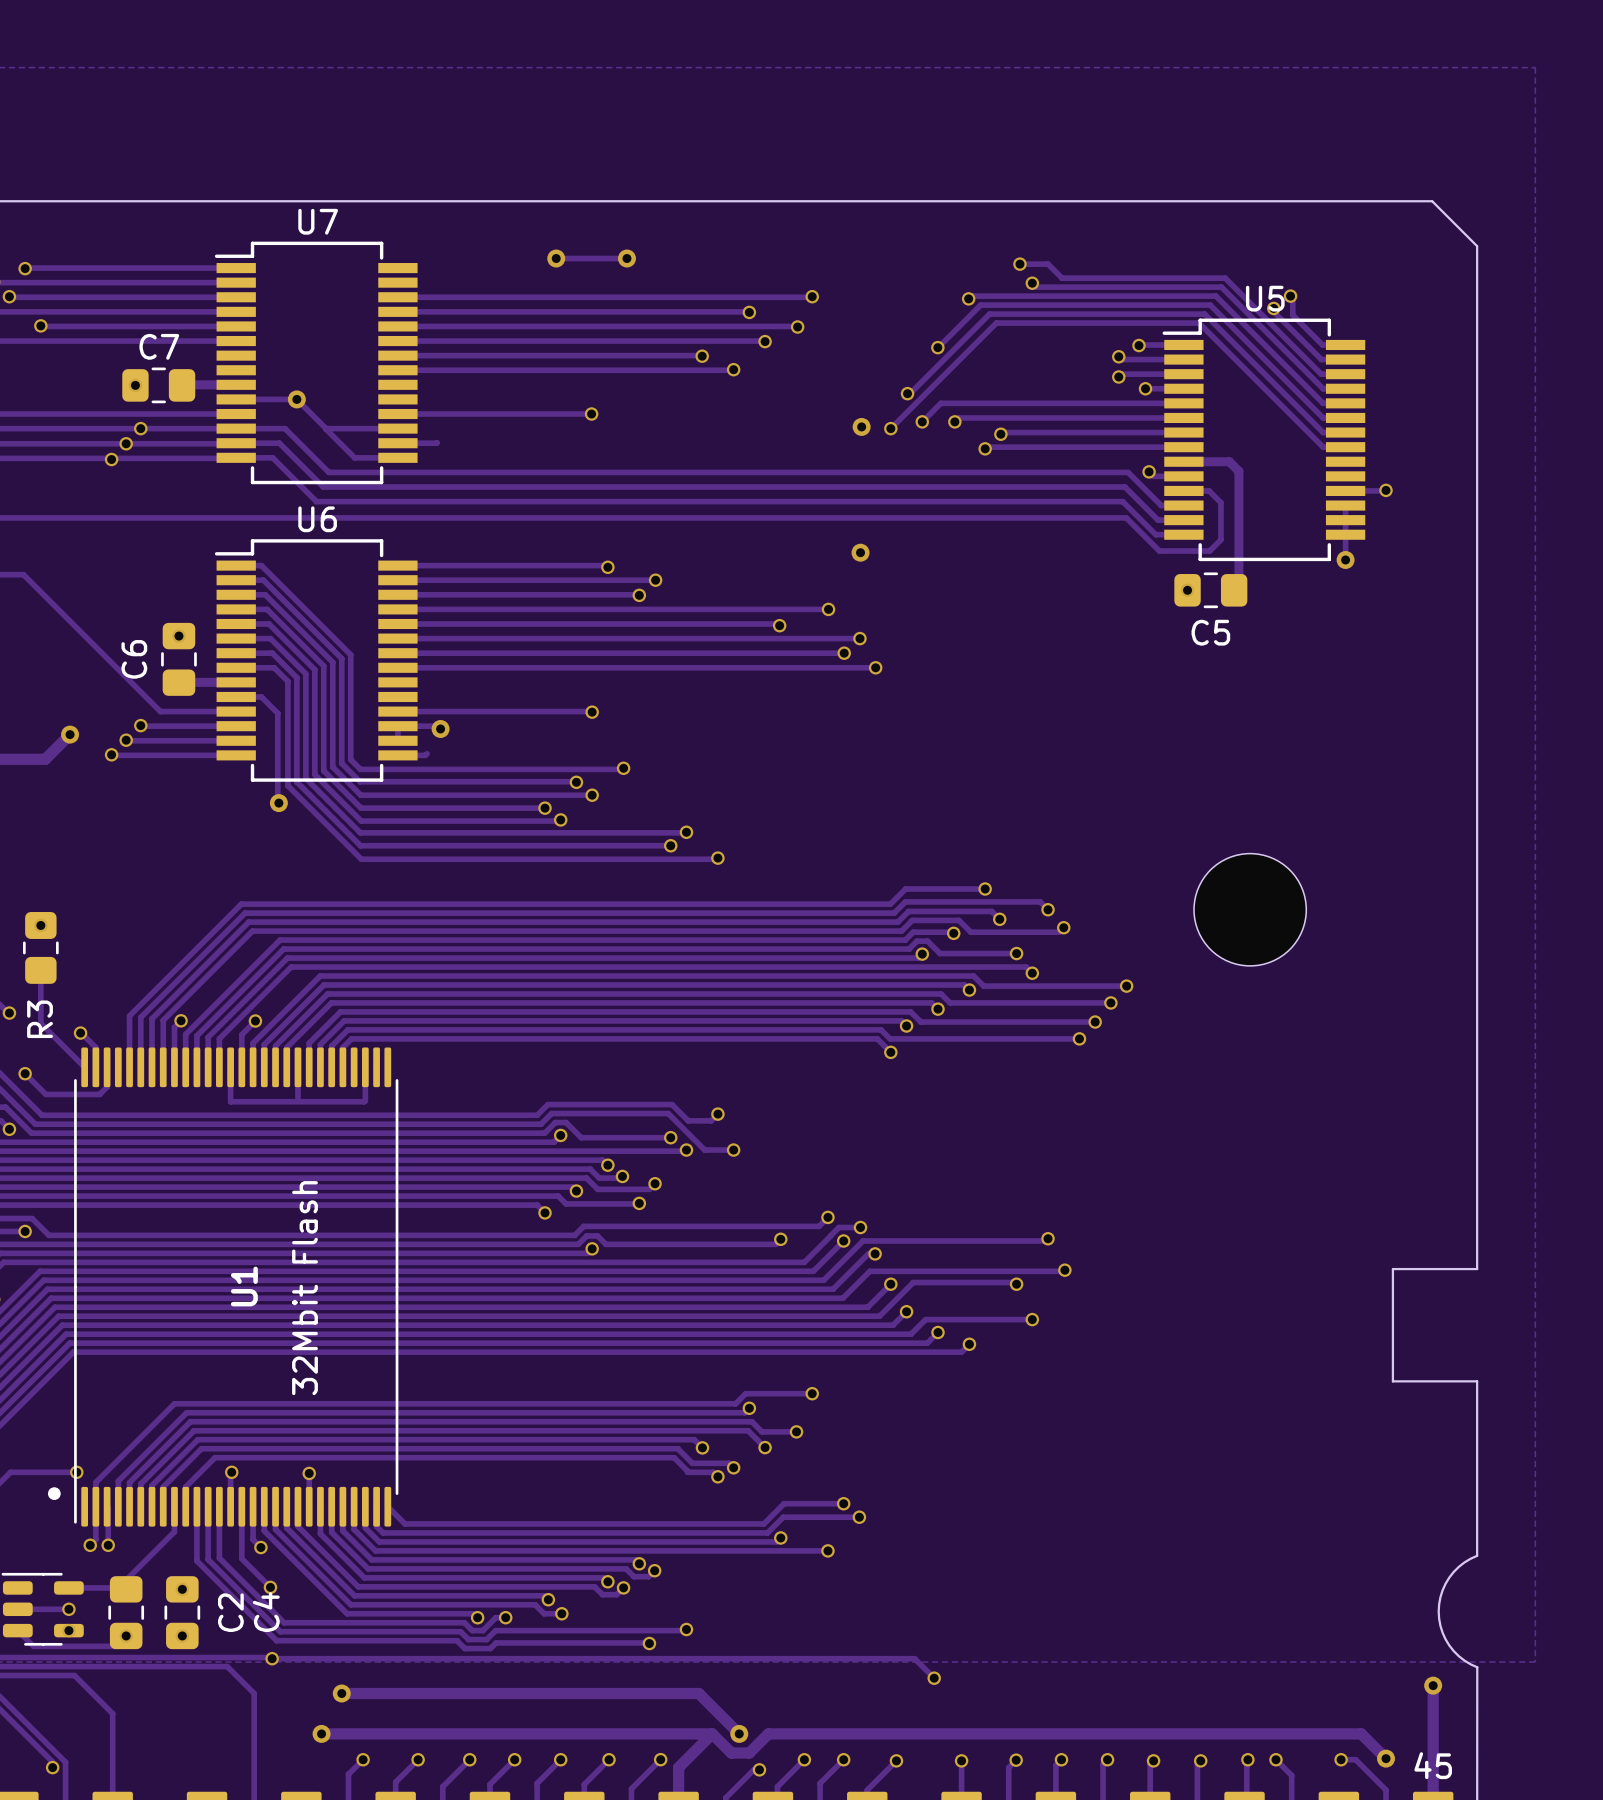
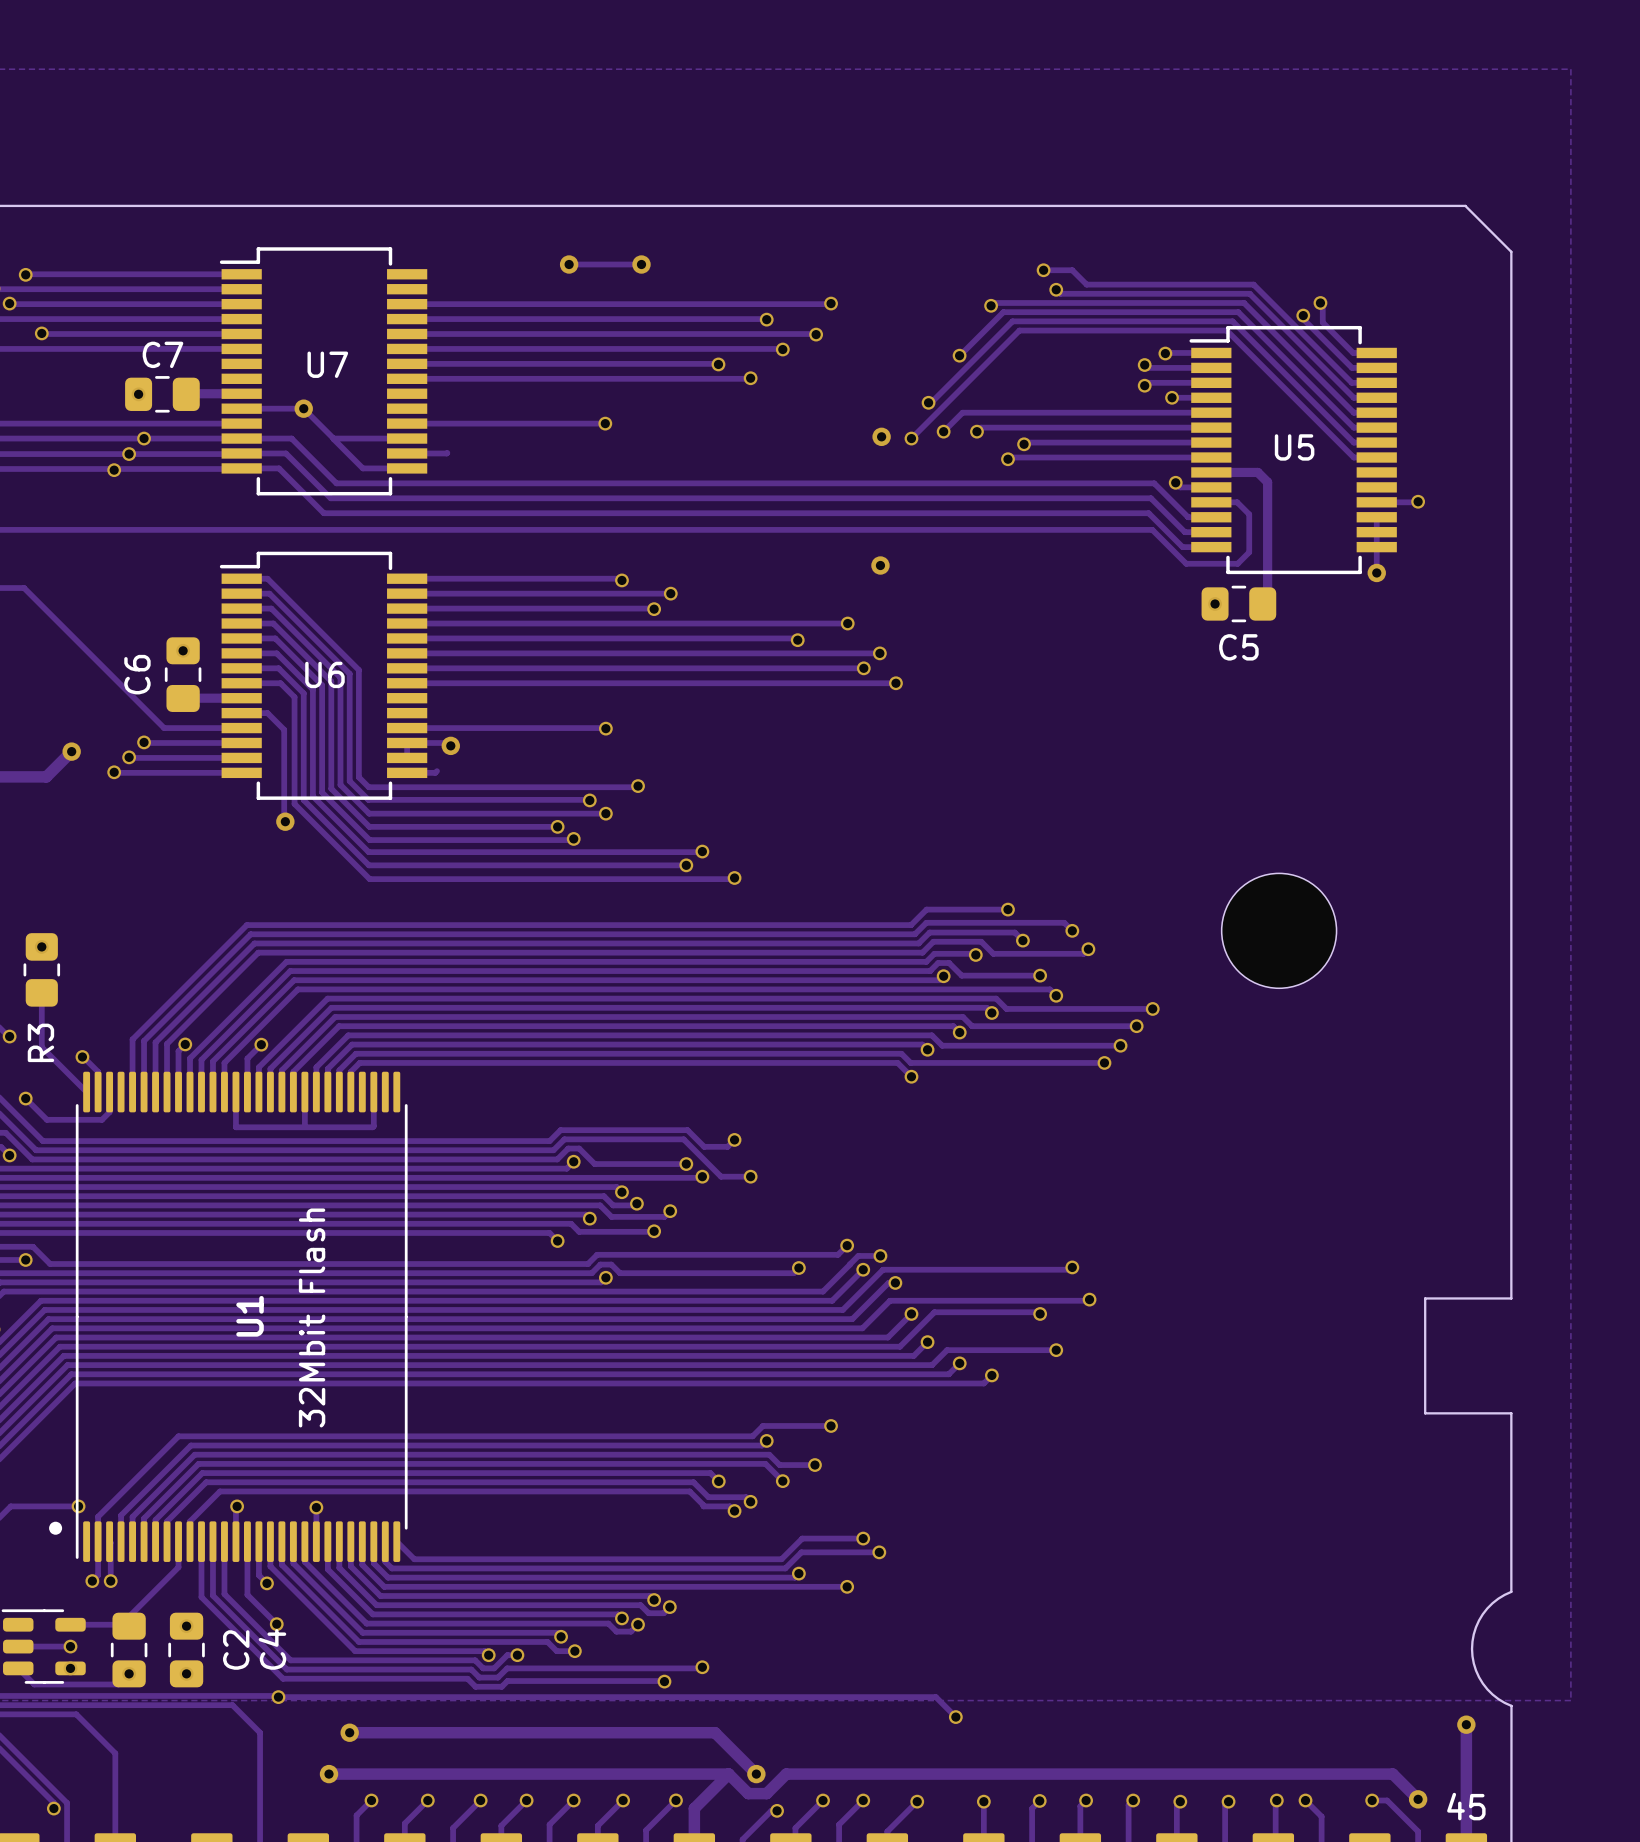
U7 name position: U7 (318, 221) -> U7 (327, 364)
U5 name position: U5 (1265, 298) -> U5 (1294, 447)
U6 name position: U6 (317, 519) -> U6 (324, 674)

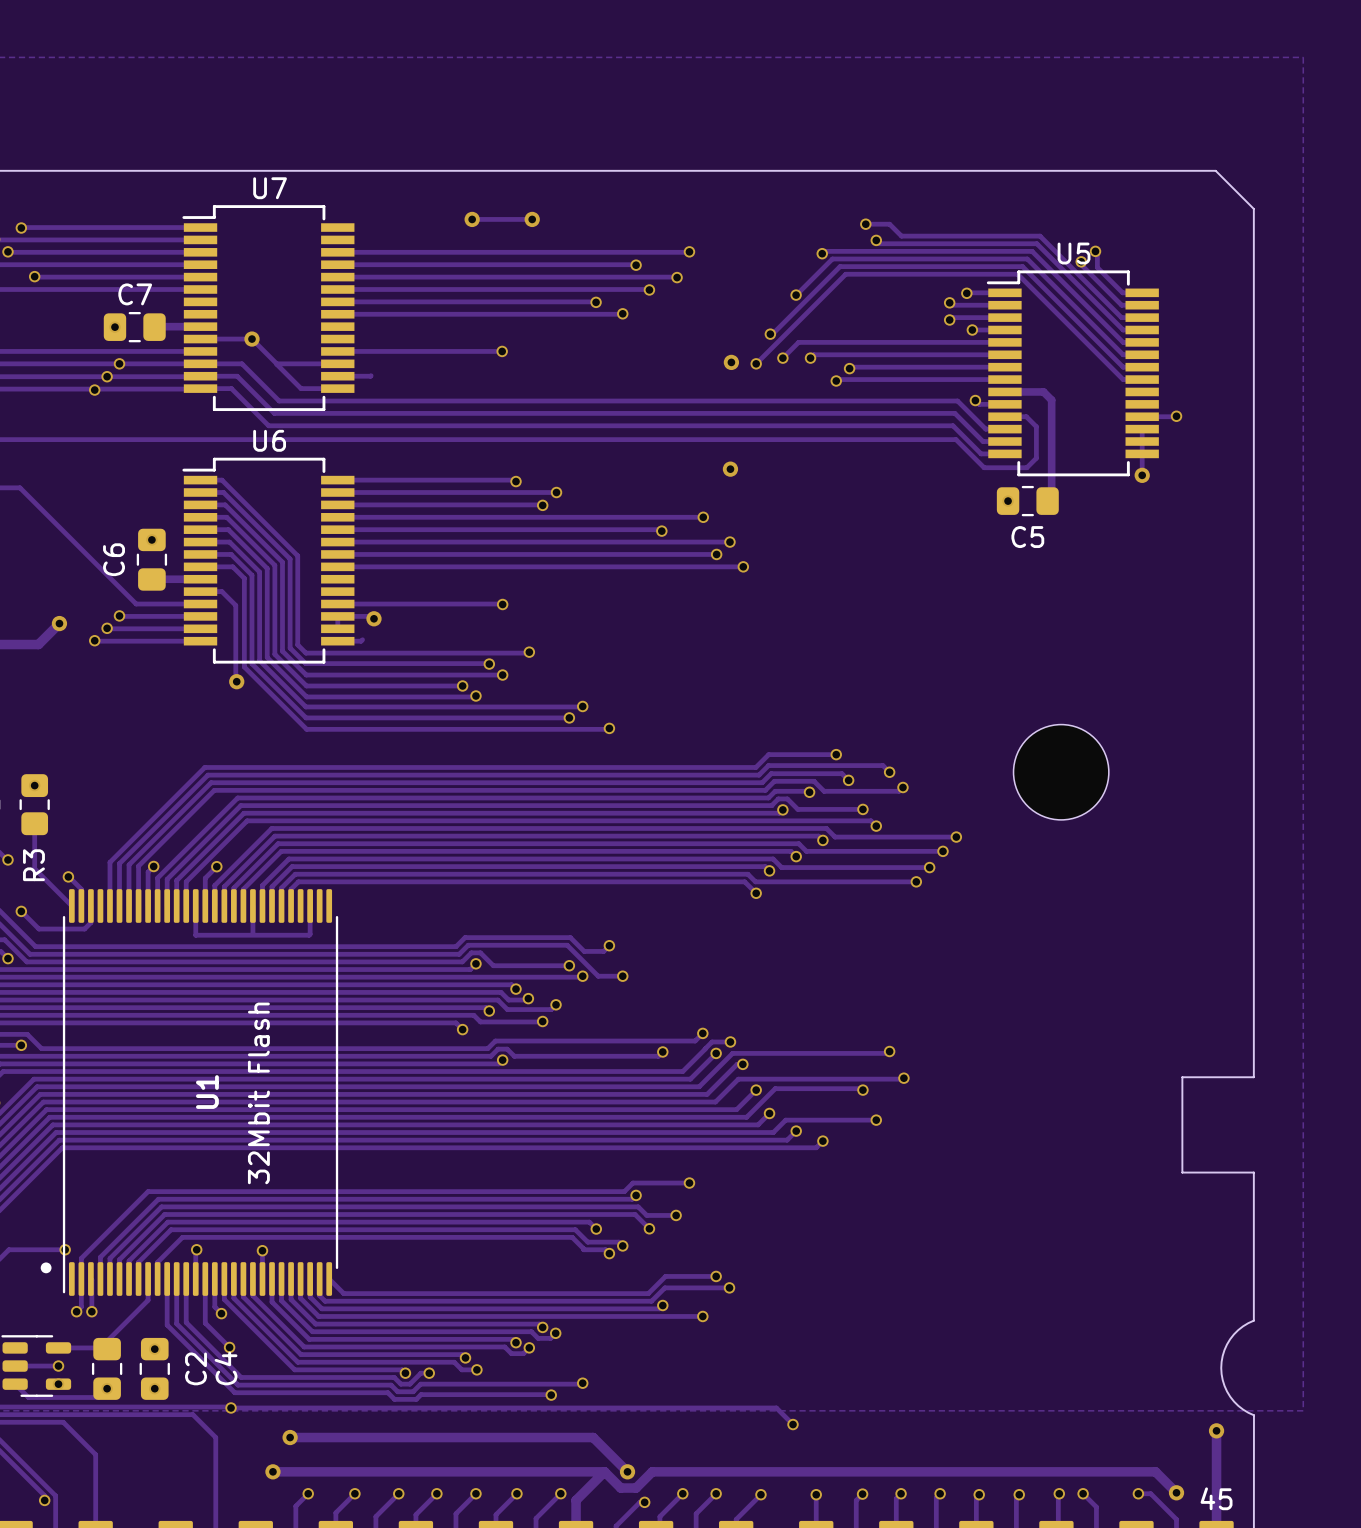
U7 name position: U7 (327, 364) -> U7 (270, 188)
U5 name position: U5 (1294, 447) -> U5 (1074, 253)
U6 name position: U6 (324, 674) -> U6 (269, 440)

